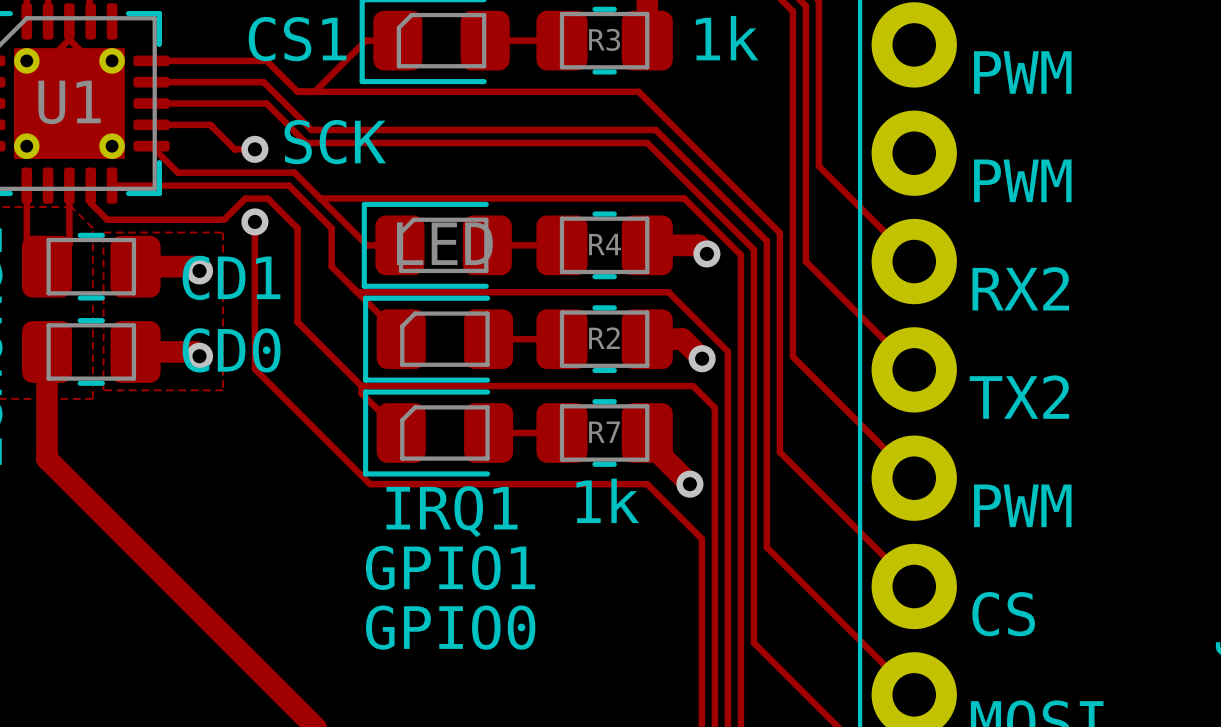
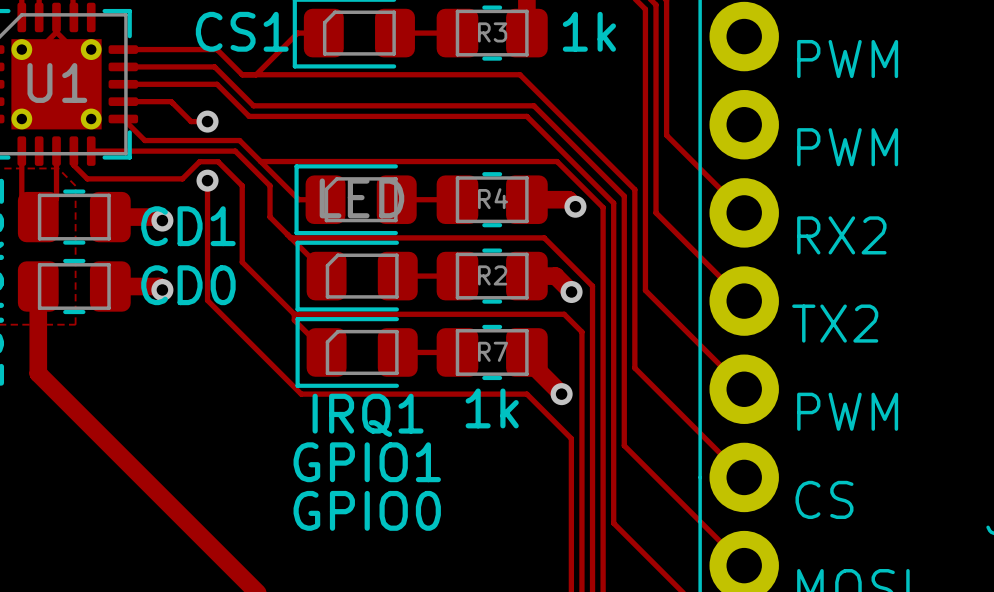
text: SCK (335, 142) -> none
zone outline: (103, 232) (222, 232) (222, 390) (103, 390) (103, 232) -> none

